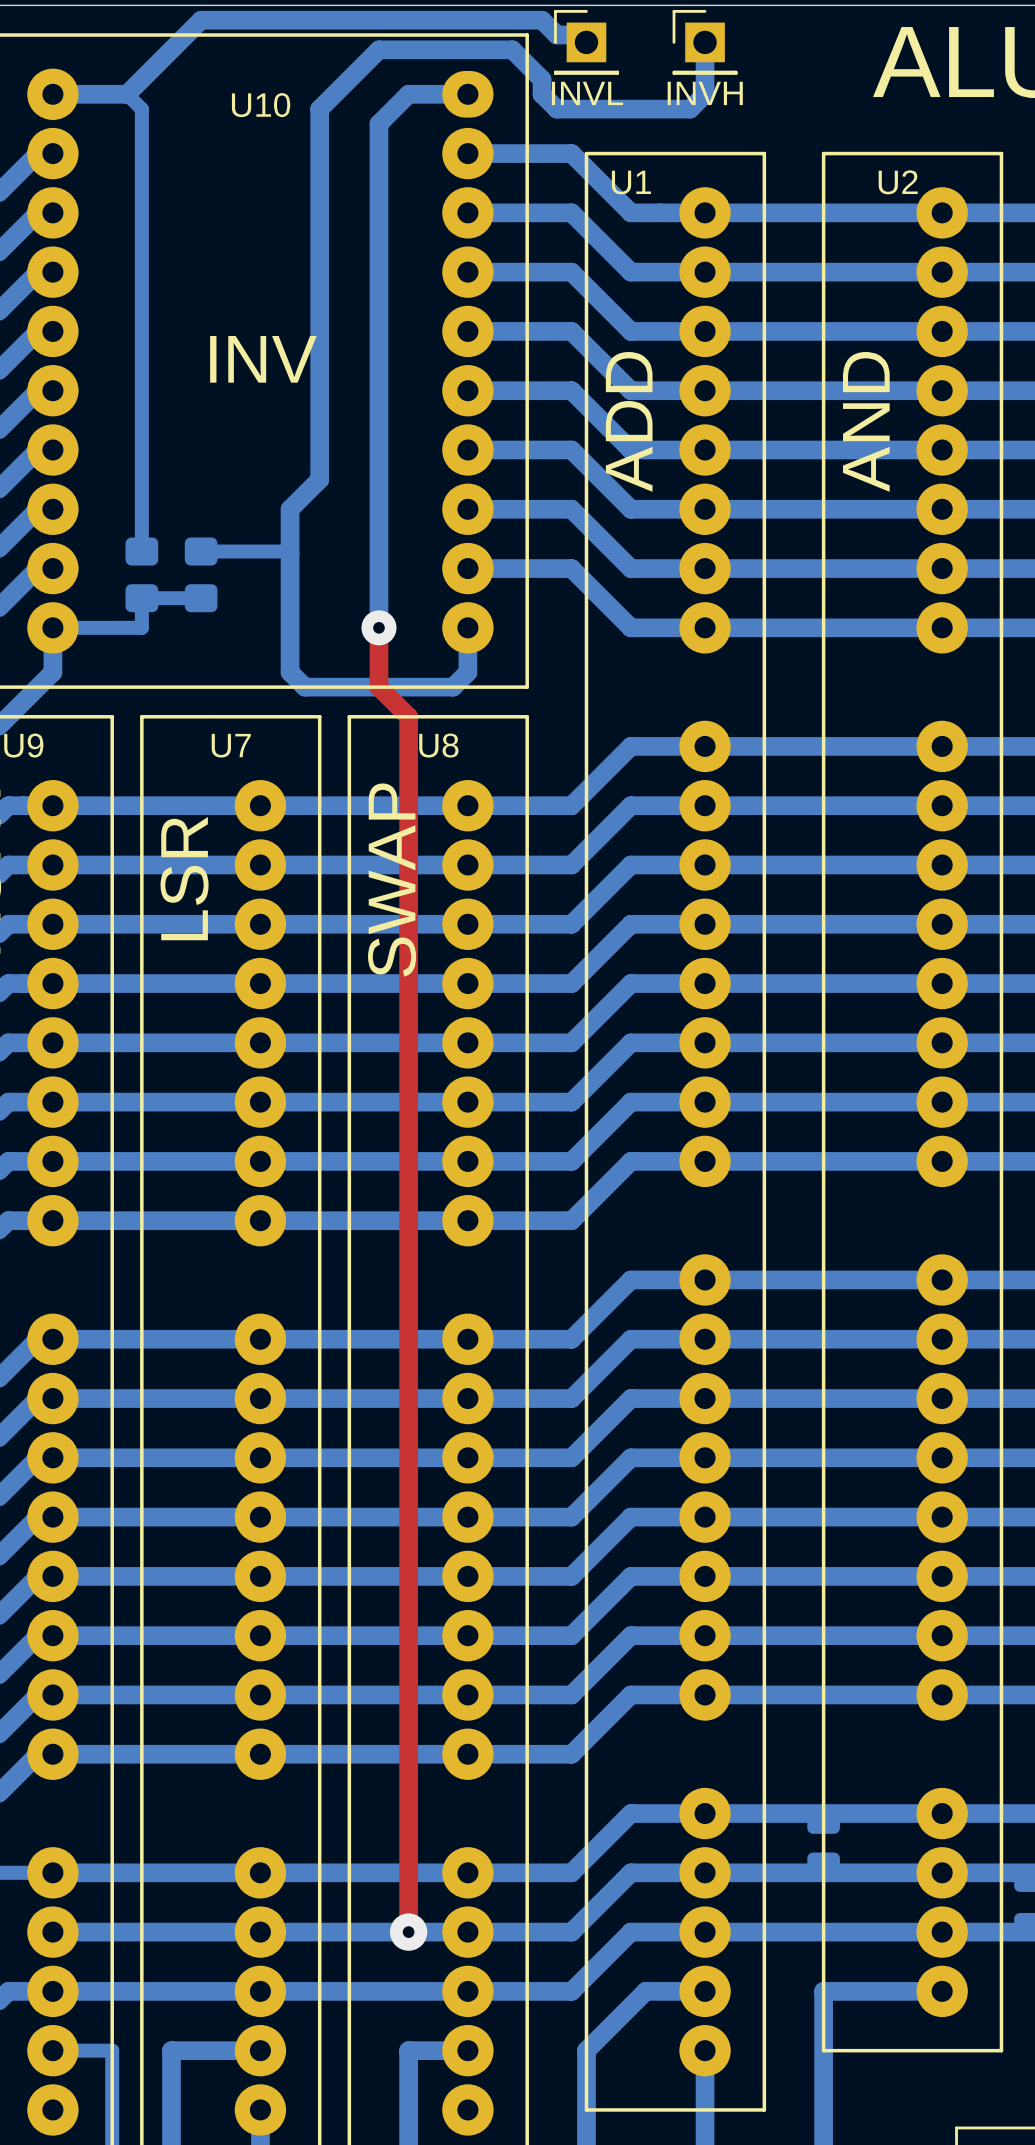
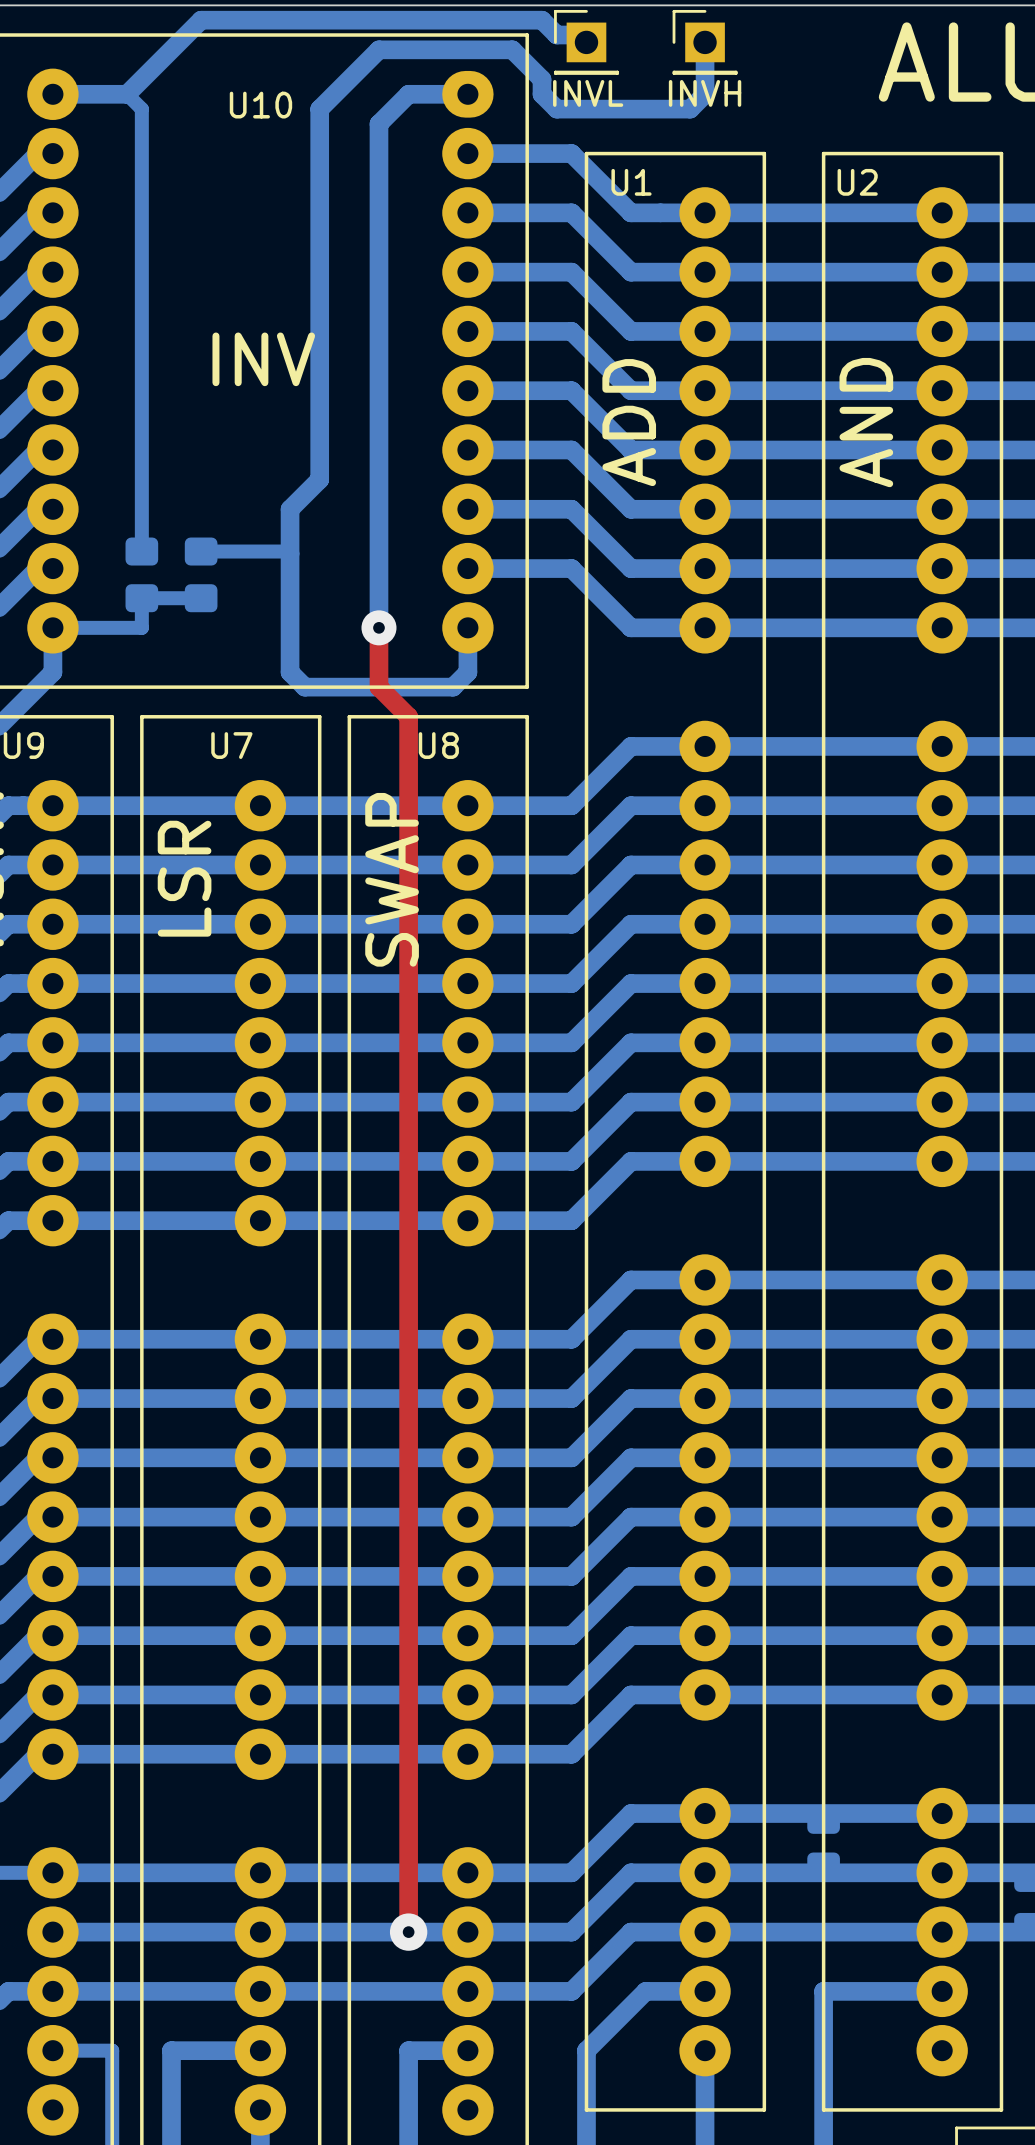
U2 footprint: [821, 151, 1004, 2053] -> [821, 151, 1004, 2112]
U2 name position: U2 (898, 182) -> U2 (857, 182)

